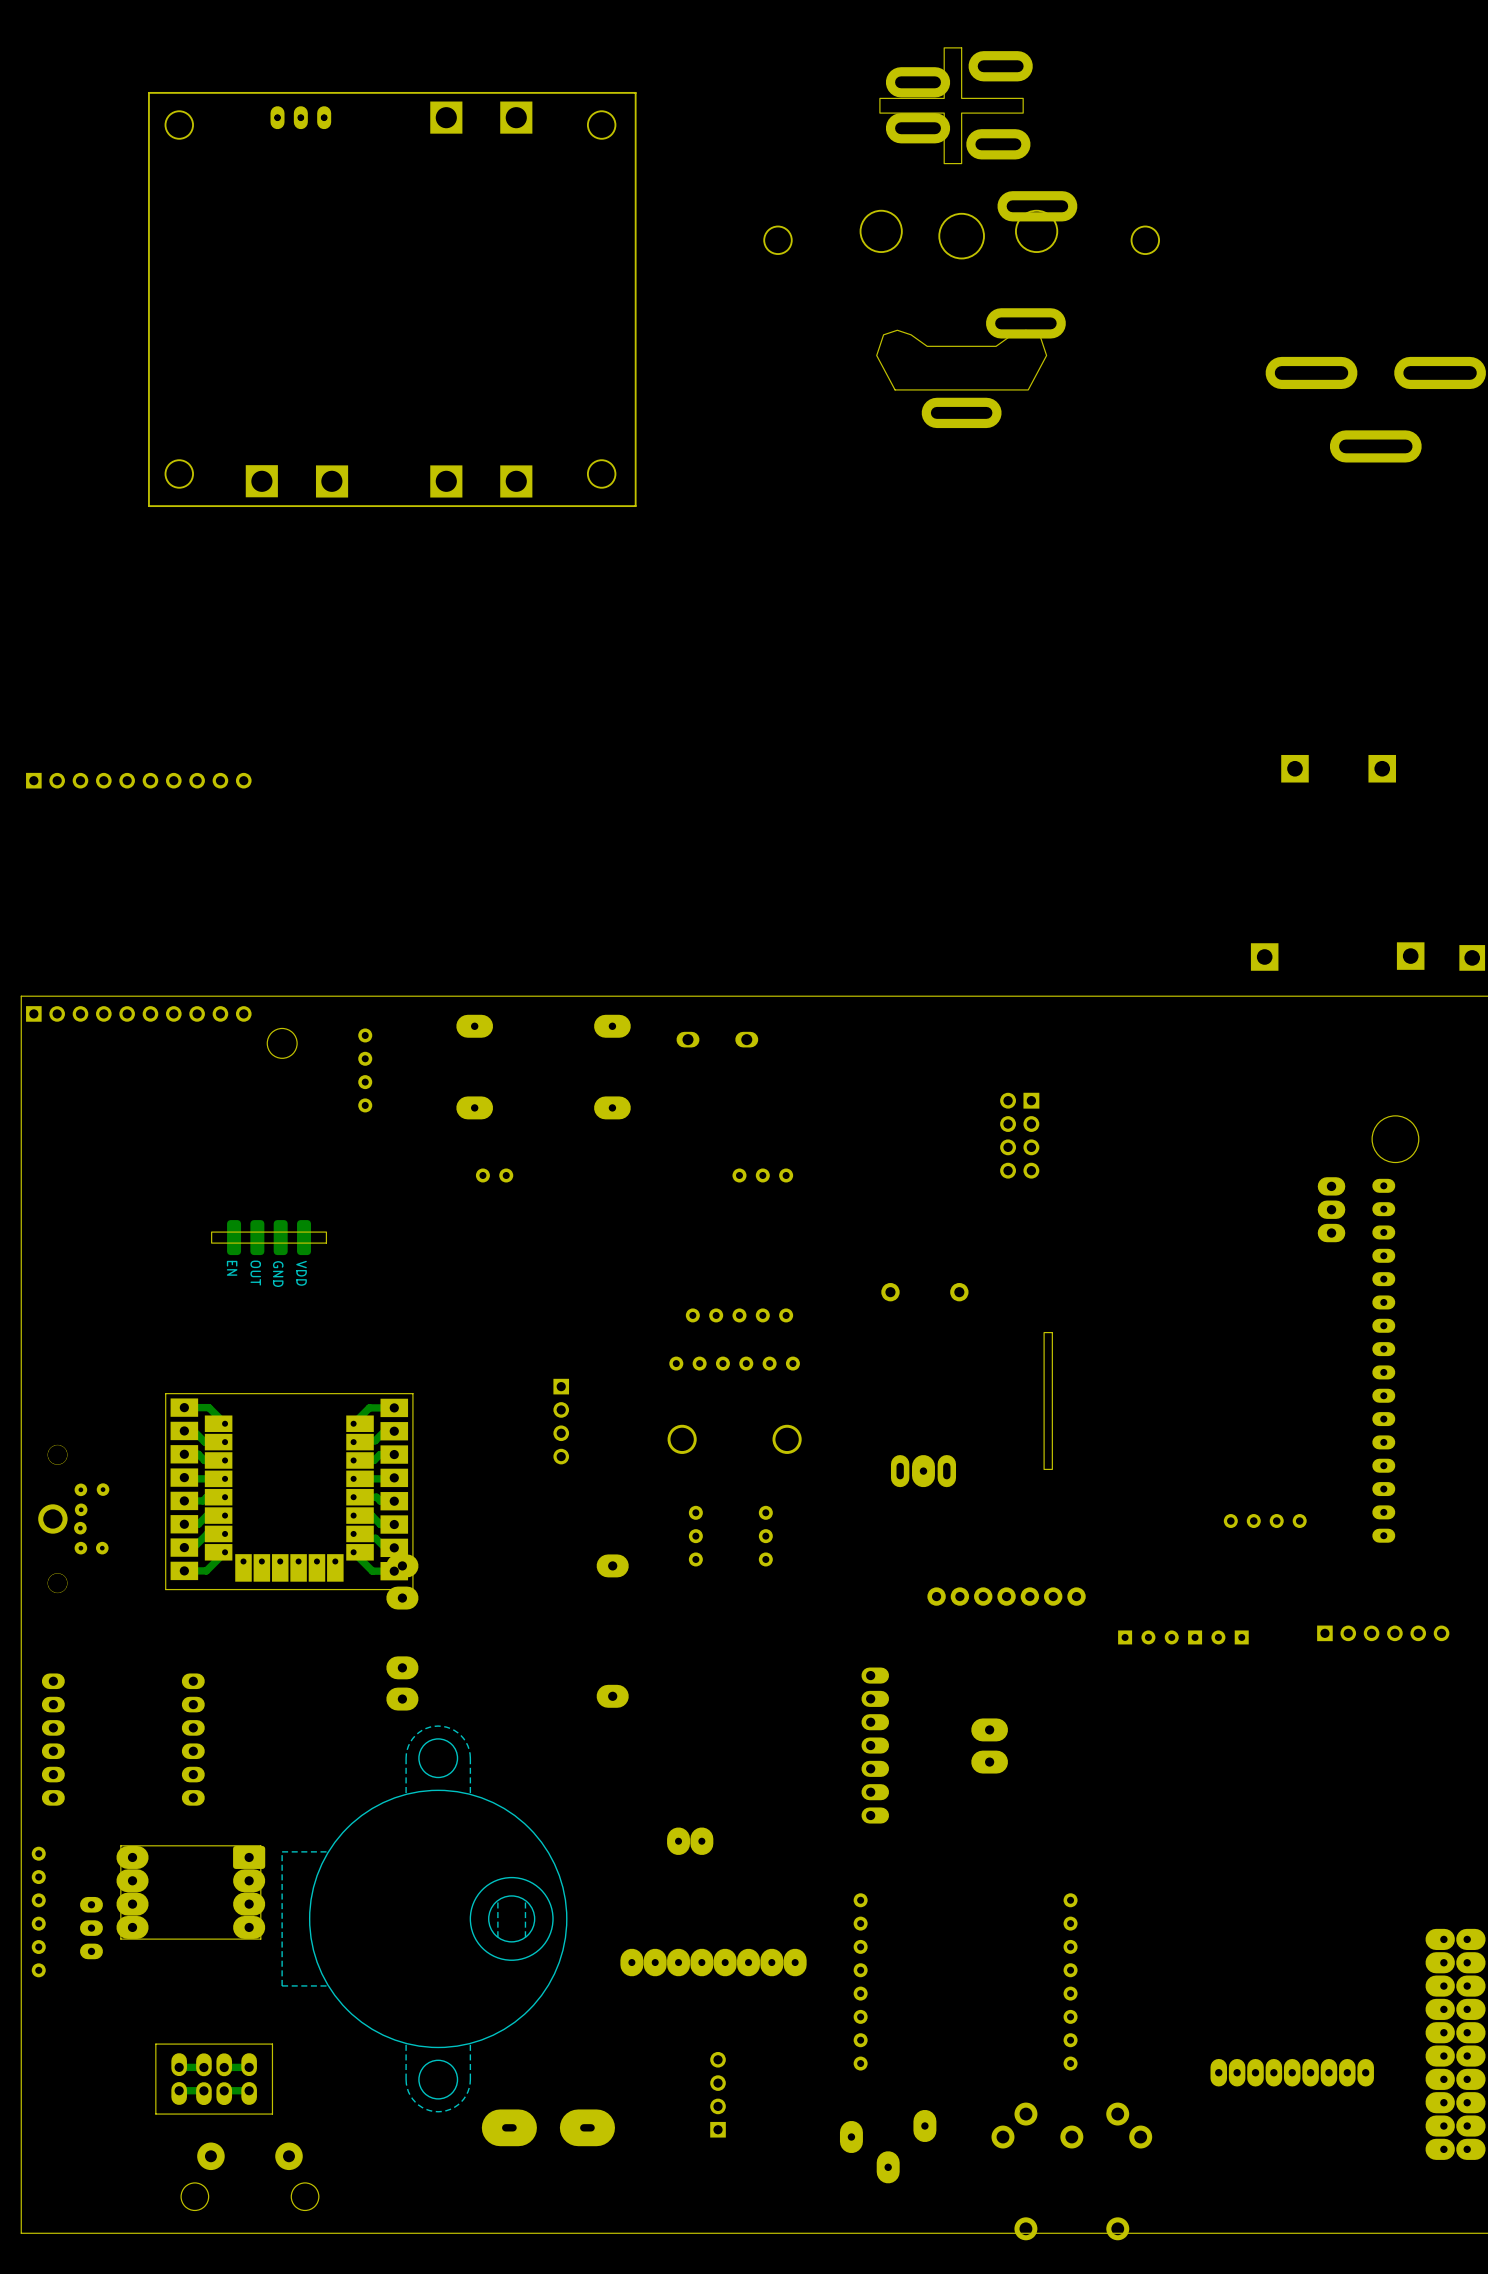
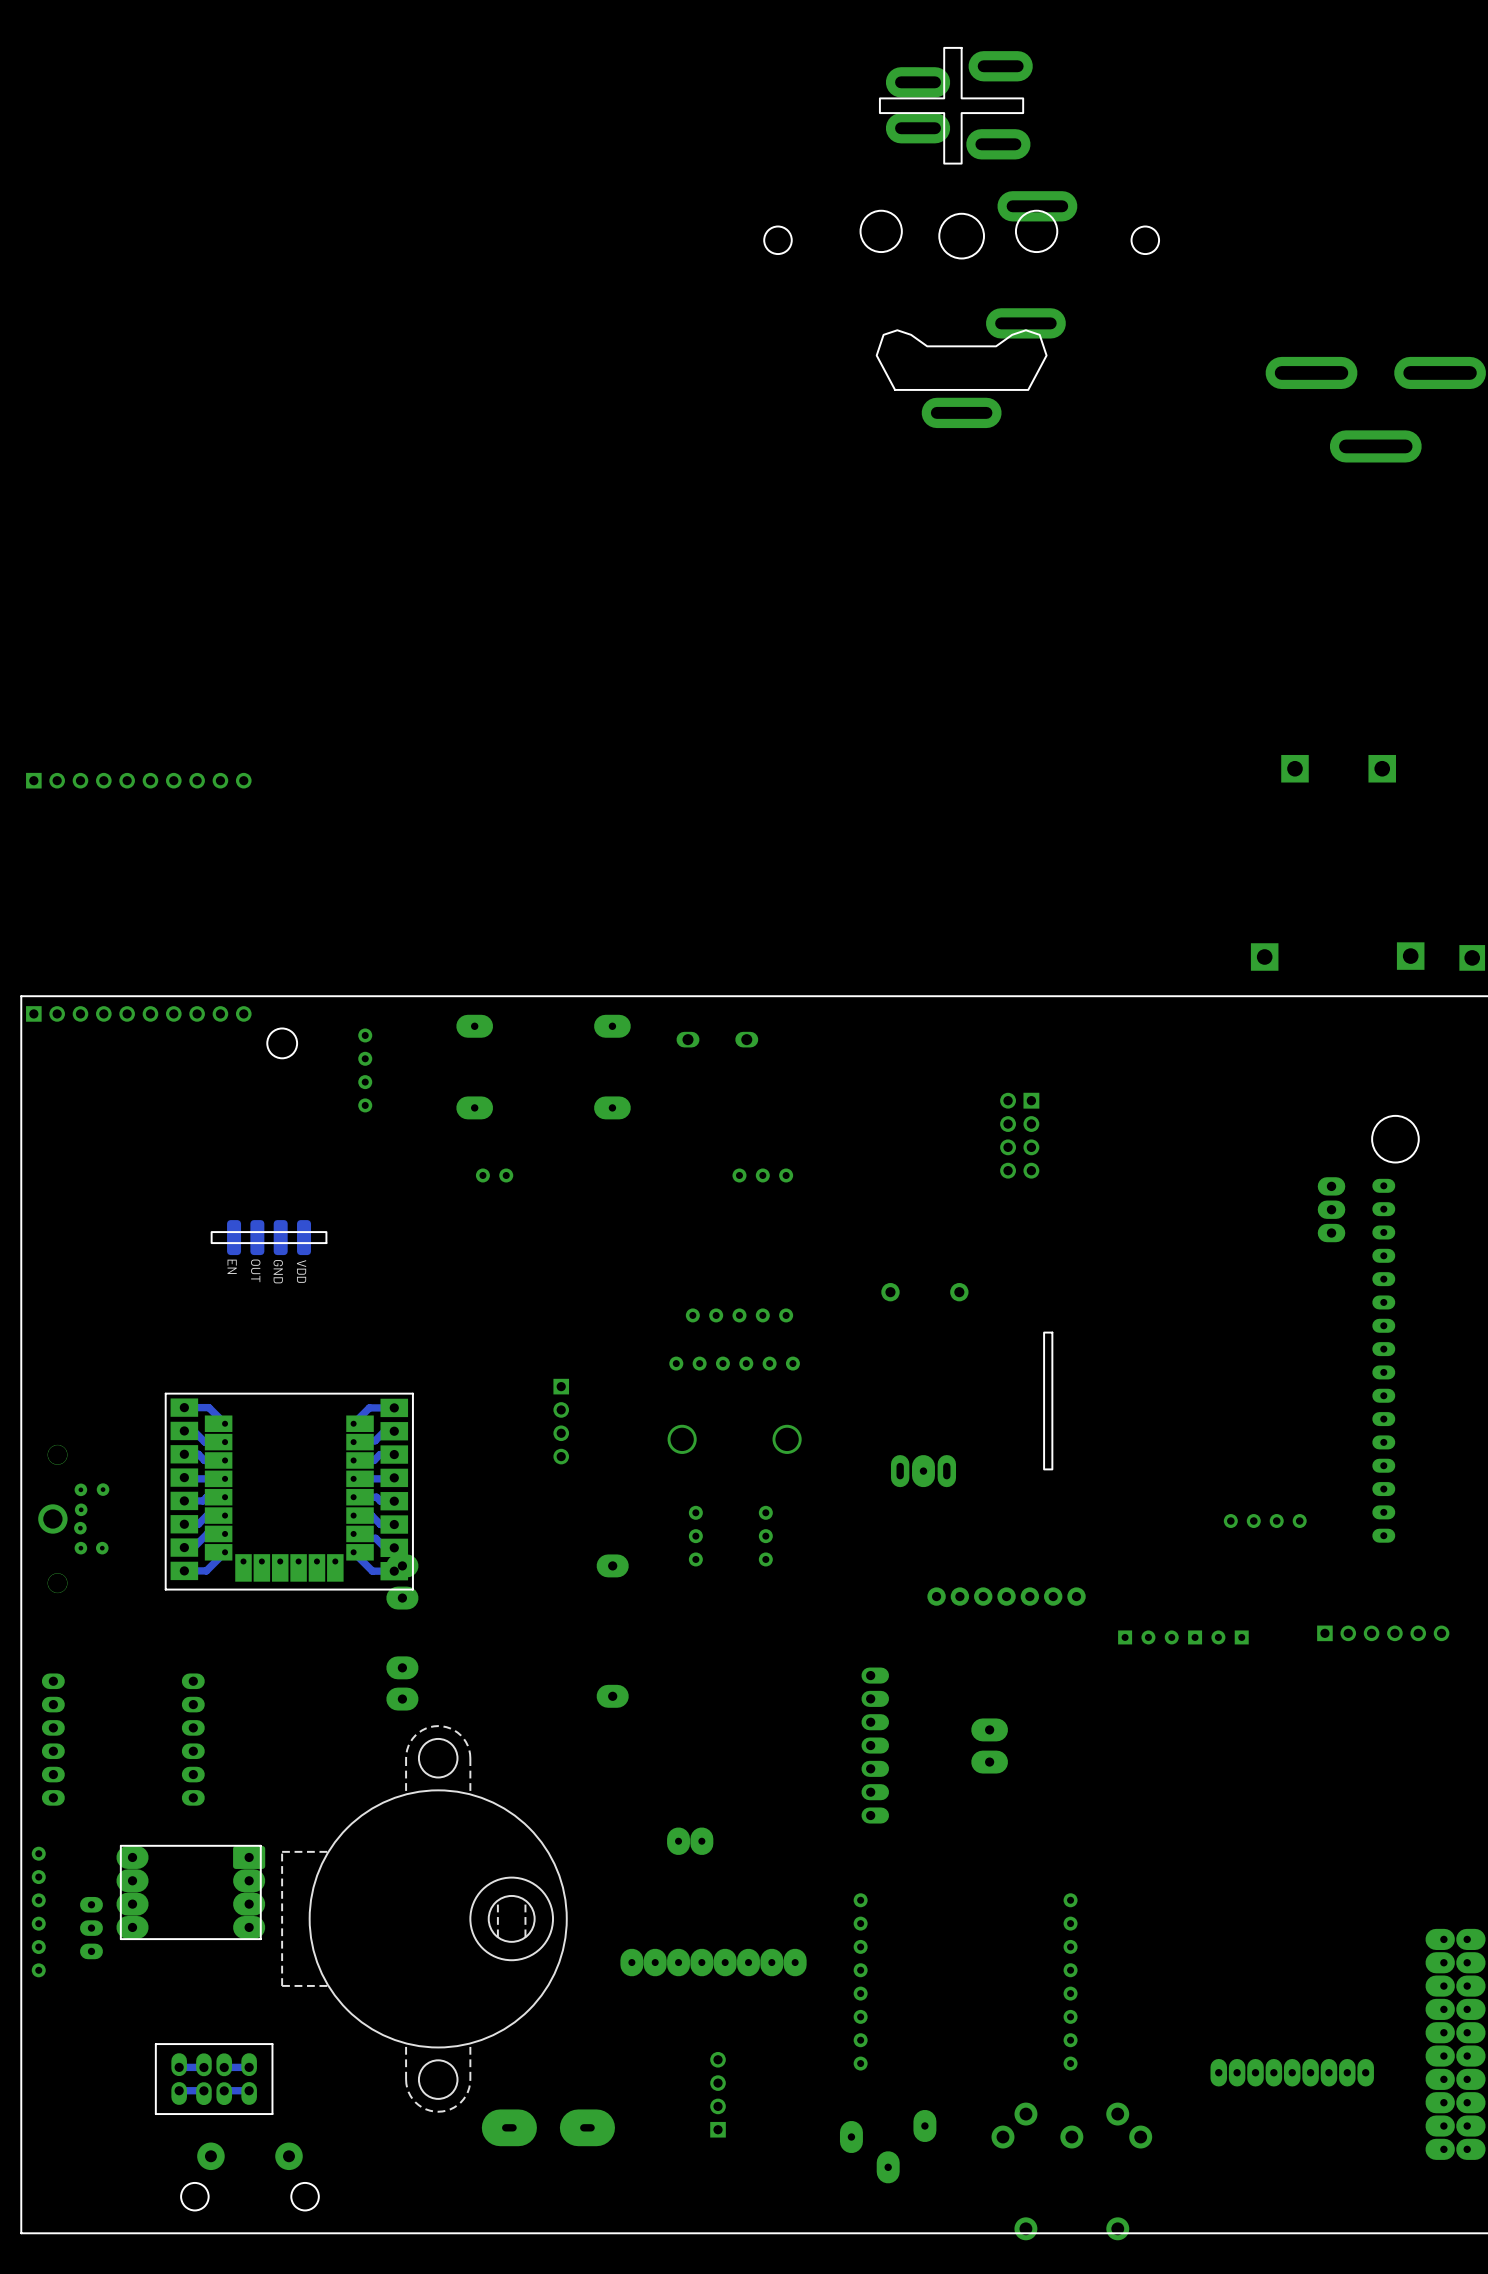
part: (392, 299) -> none

